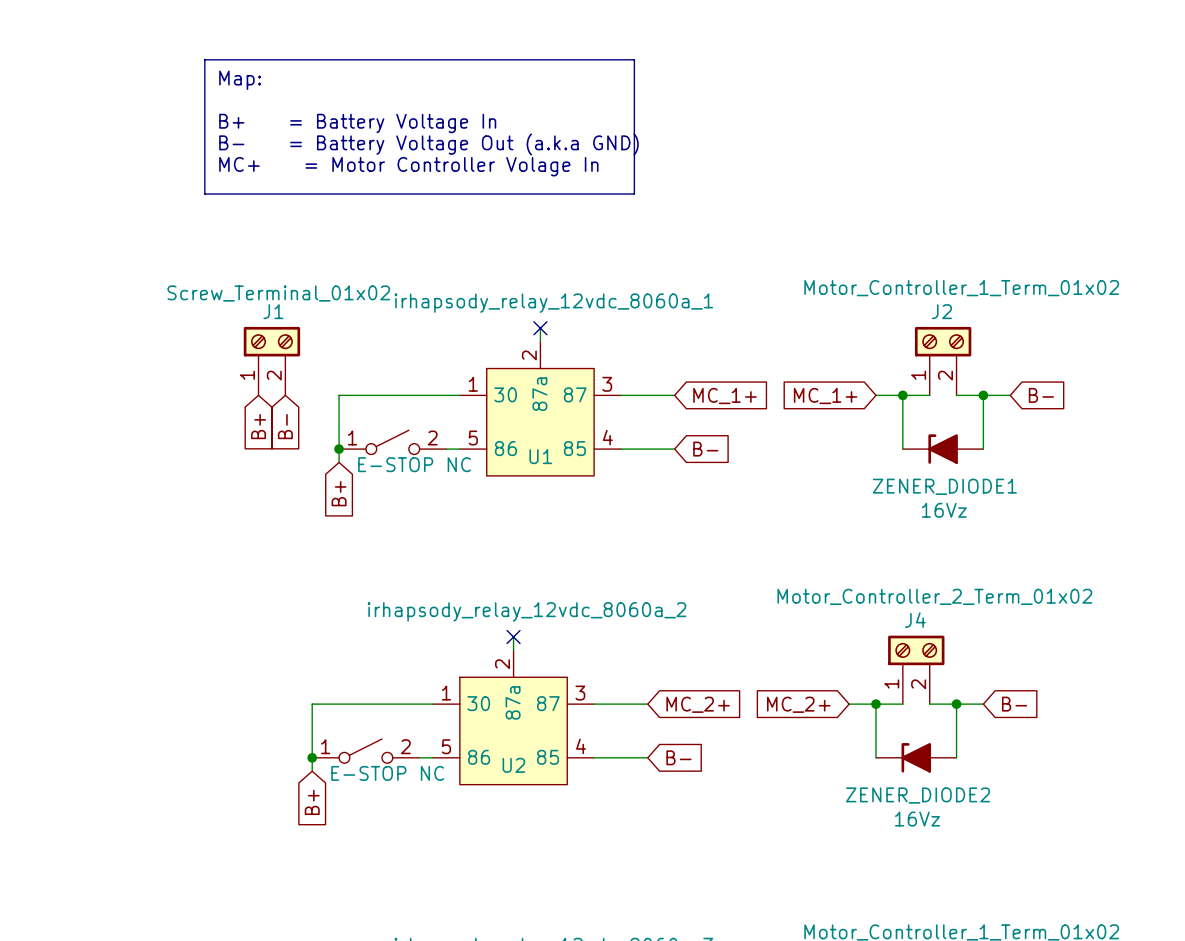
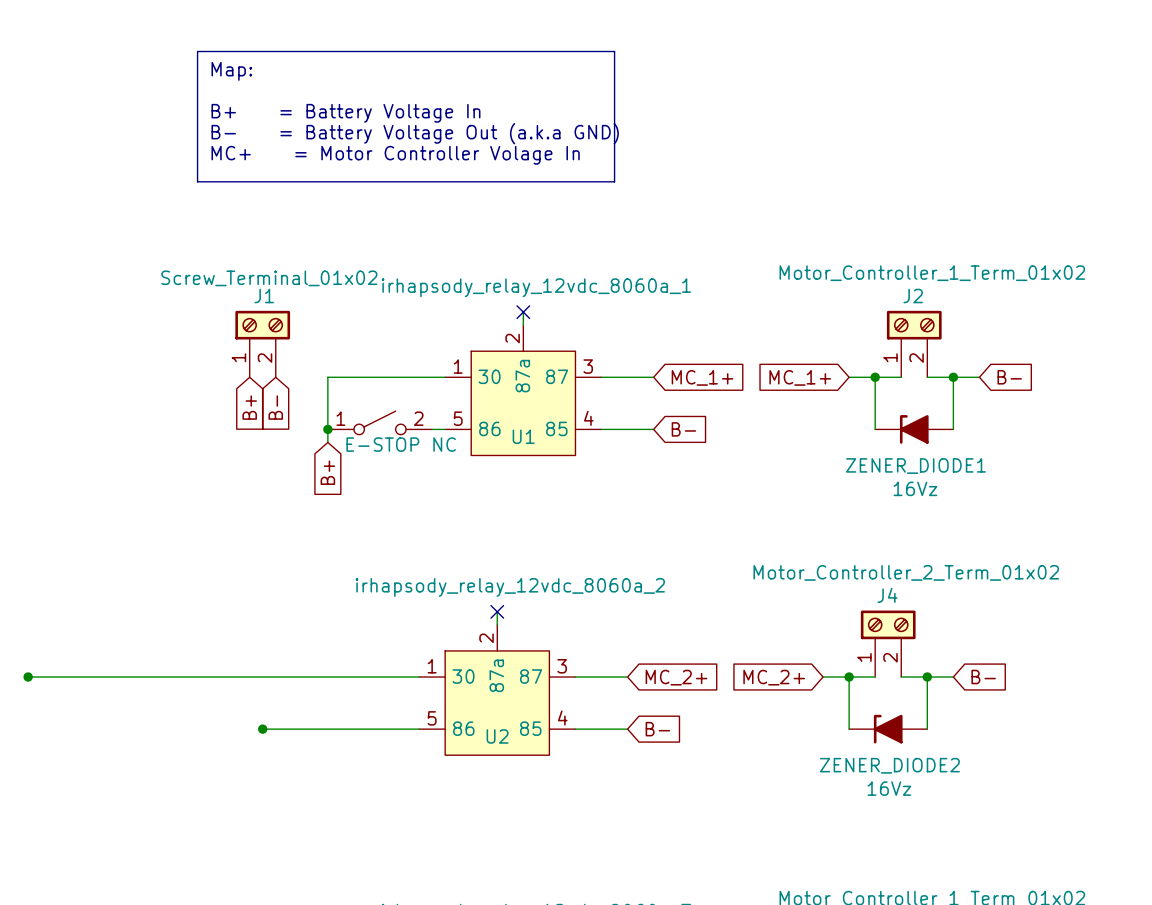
junction: none -> (28, 677)
wire: (312, 704) (312, 771) -> (301, 677) (28, 677)
part: E-STOP NC (365, 751) -> none
wire: none -> (262, 729) (406, 729)
junction position: (312, 757) -> (262, 729)
global label: B+ (312, 802) -> none

